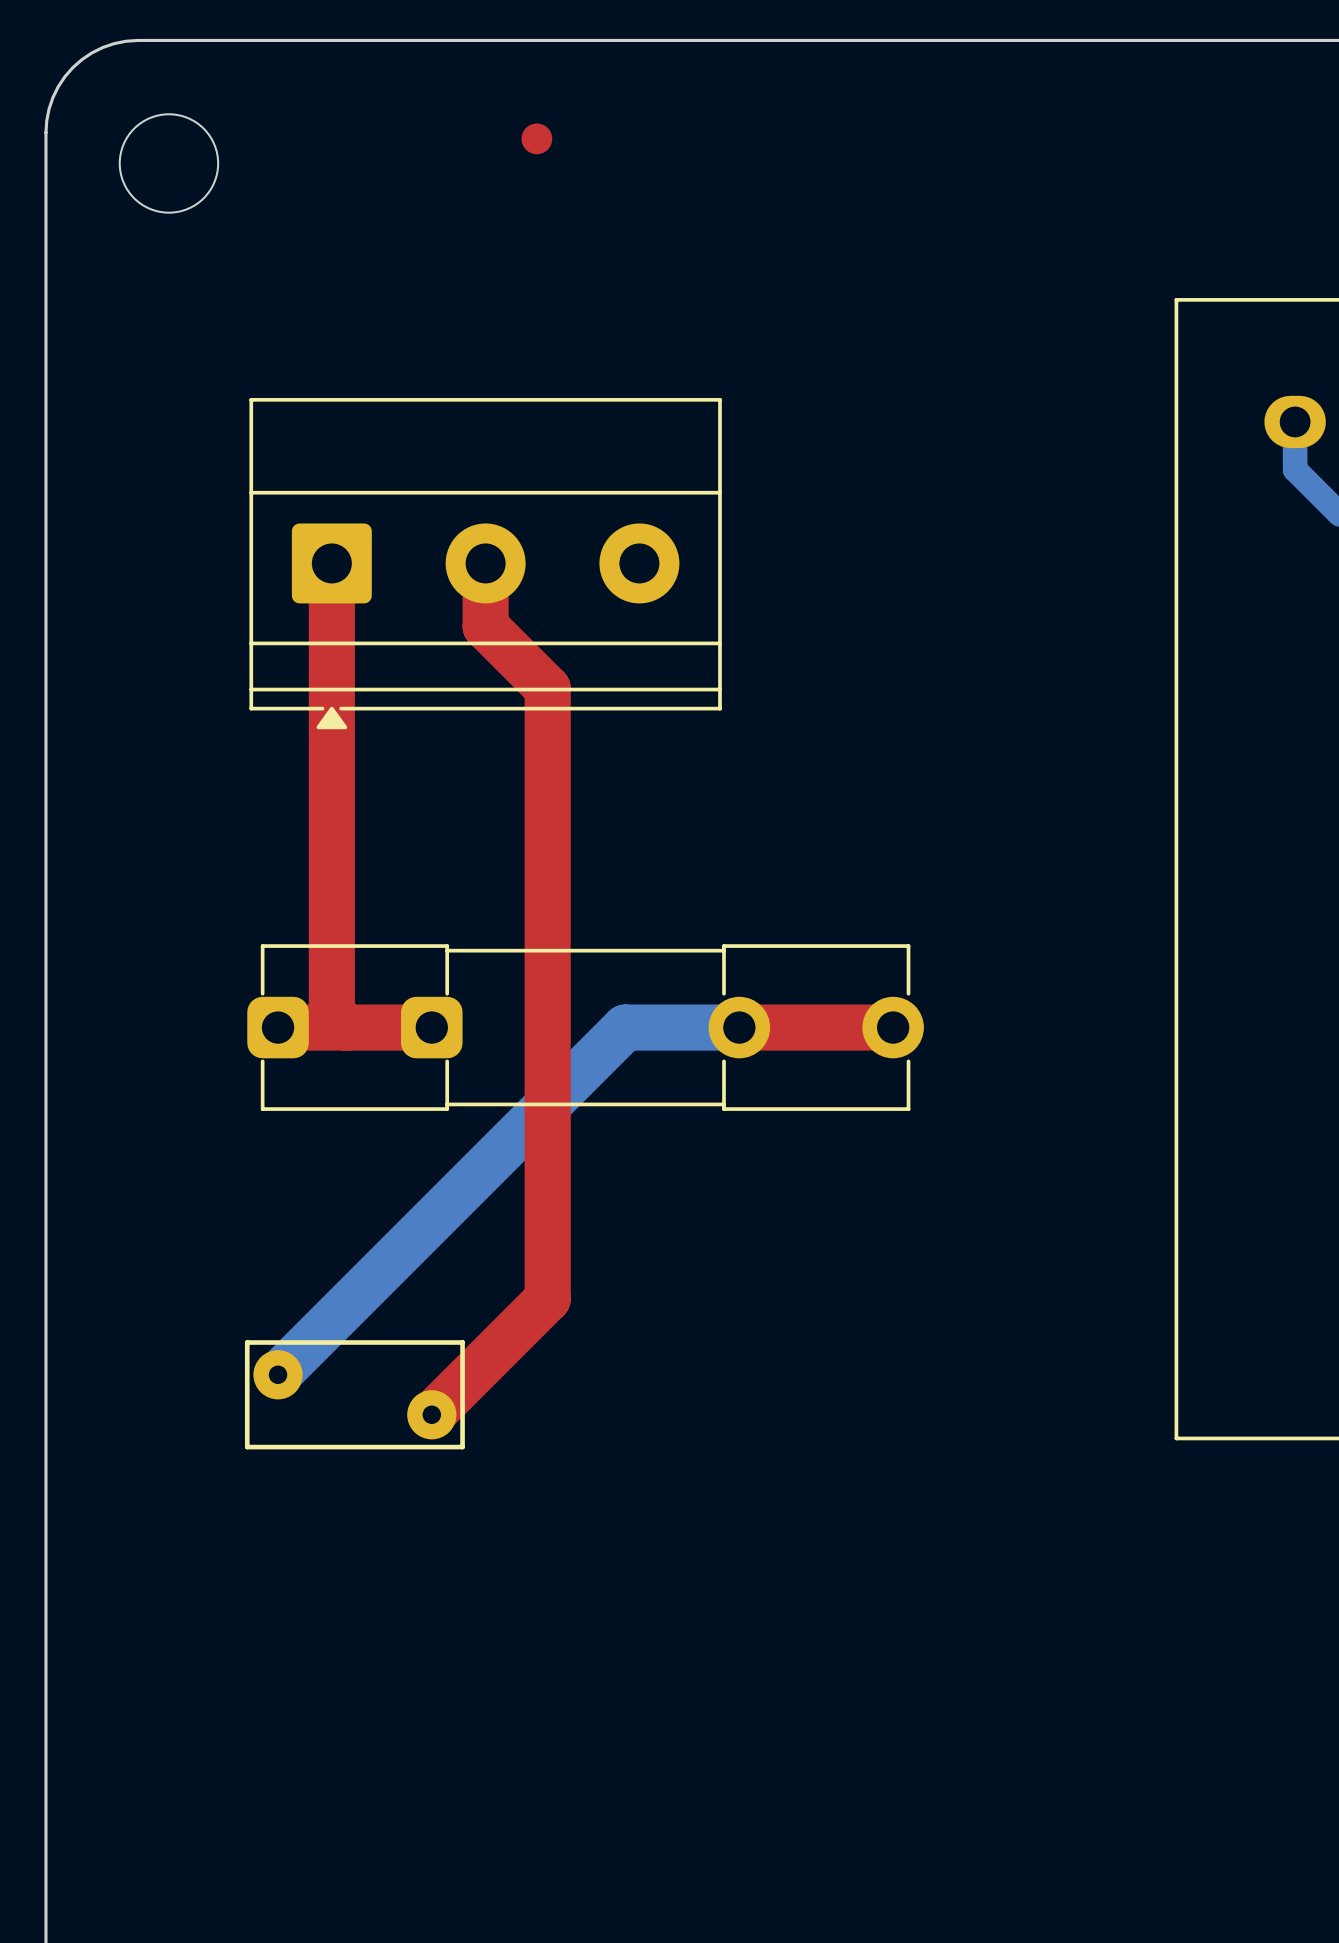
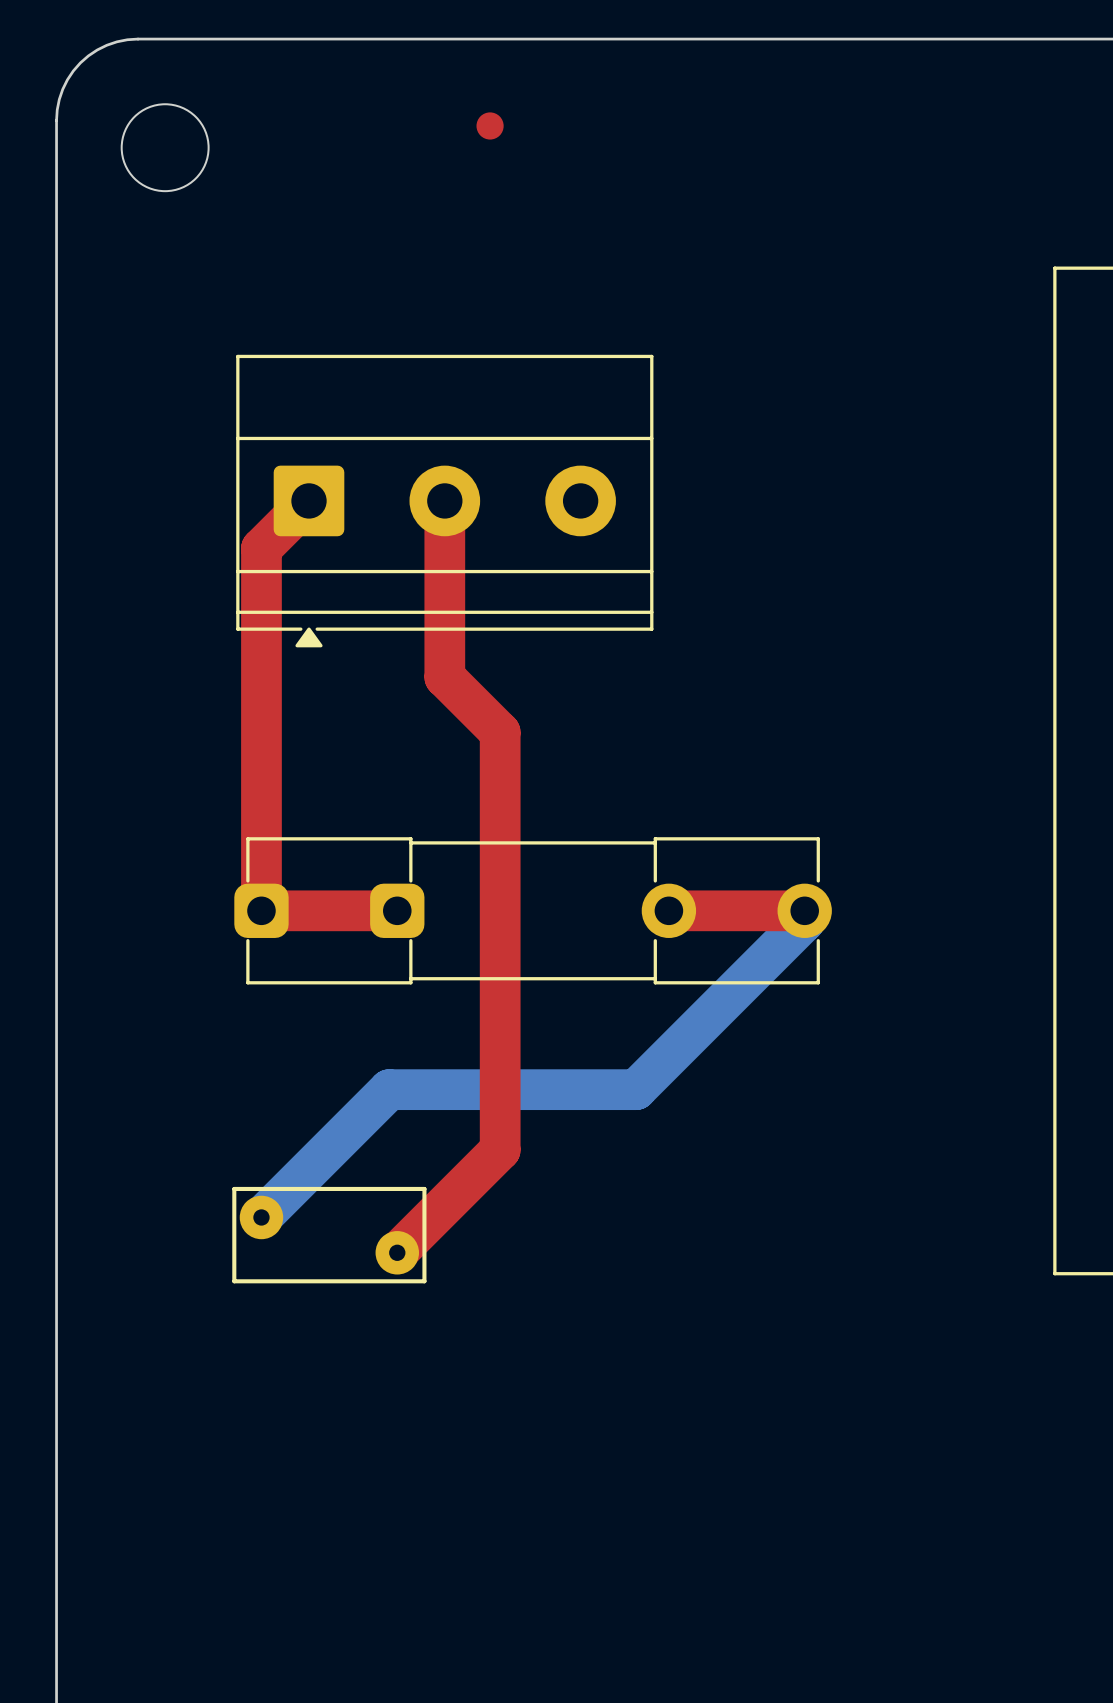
top track: (331, 563) (331, 1012) (346, 1027) -> (309, 500) (261, 548) (261, 910)
top track: (485, 626) (547, 688) (547, 1298) -> (444, 556) (444, 677) (500, 732) (499, 1150)
bottom track: (739, 1027) (625, 1027) (422, 1230) -> (804, 910) (804, 920) (635, 1089) (389, 1089)

